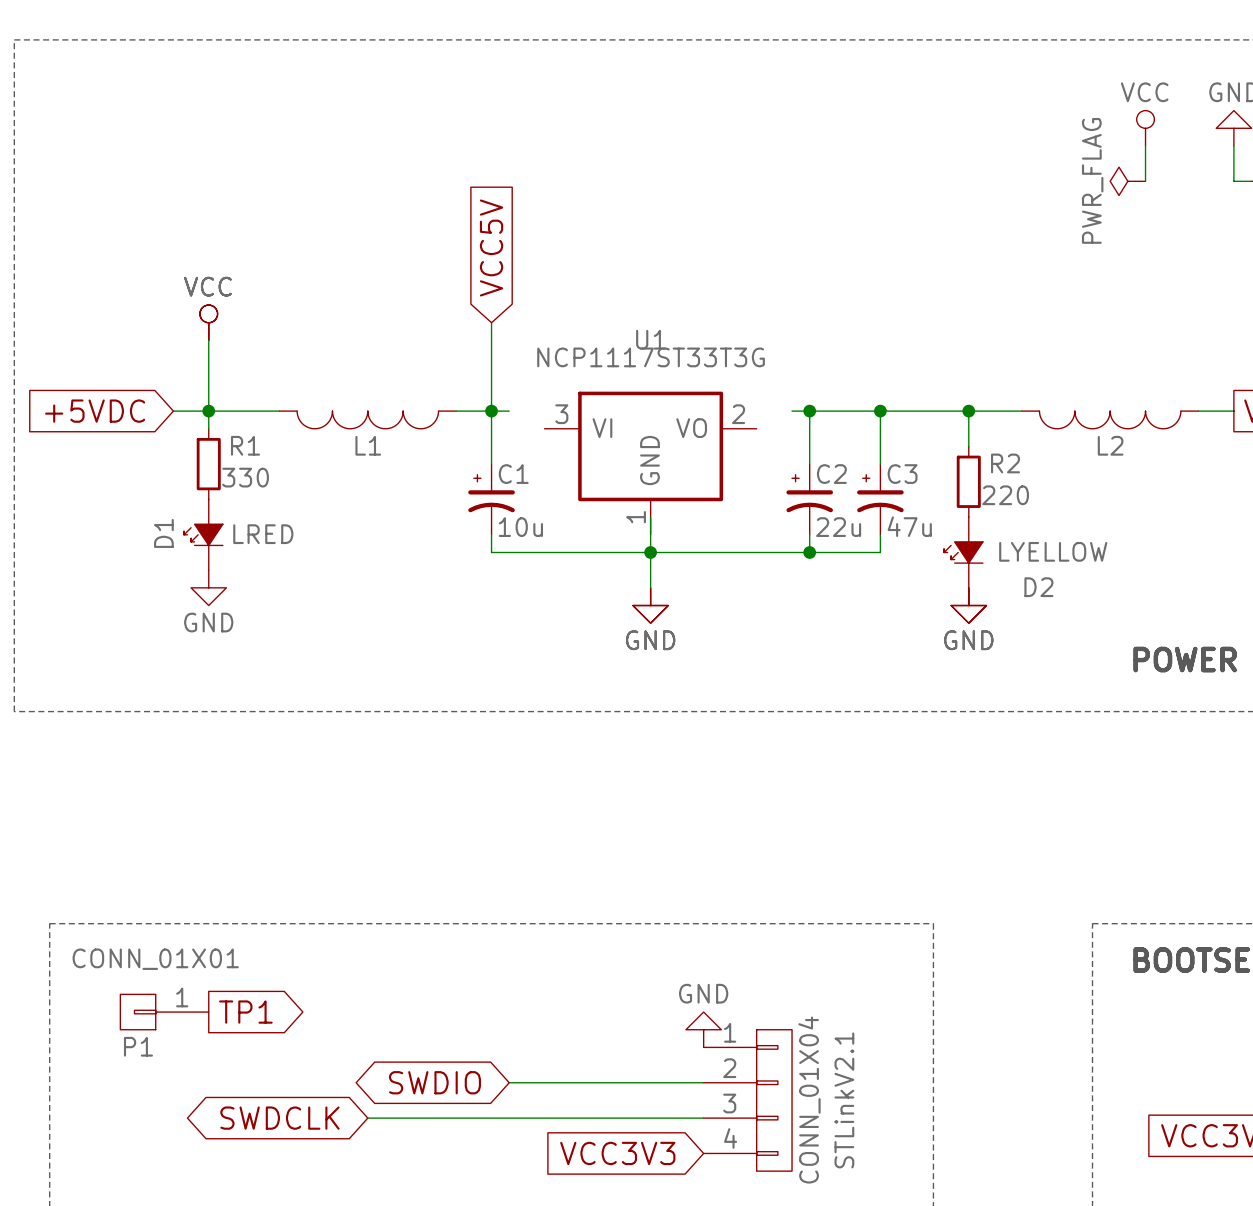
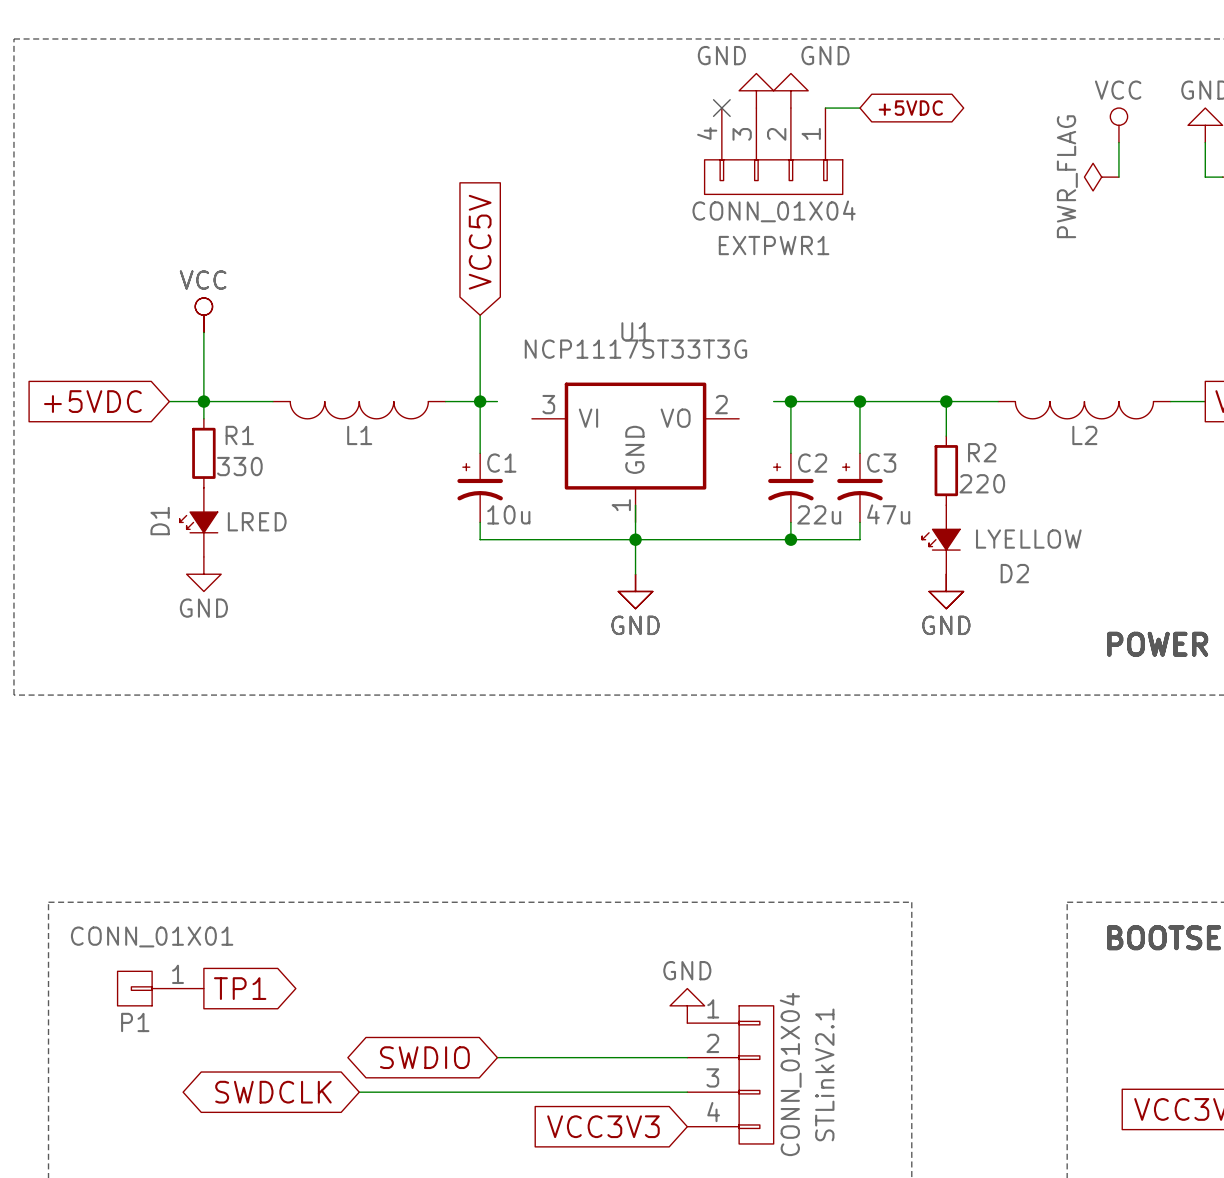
power symbol: none -> GND (756, 90)
power symbol: none -> GND (790, 90)
no-connect mark: none -> (721, 108)
wire: none -> (825, 108) (859, 108)
global label: none -> +5VDC (910, 108)
EXTPWR1: none -> CONN_01X04 (773, 151)

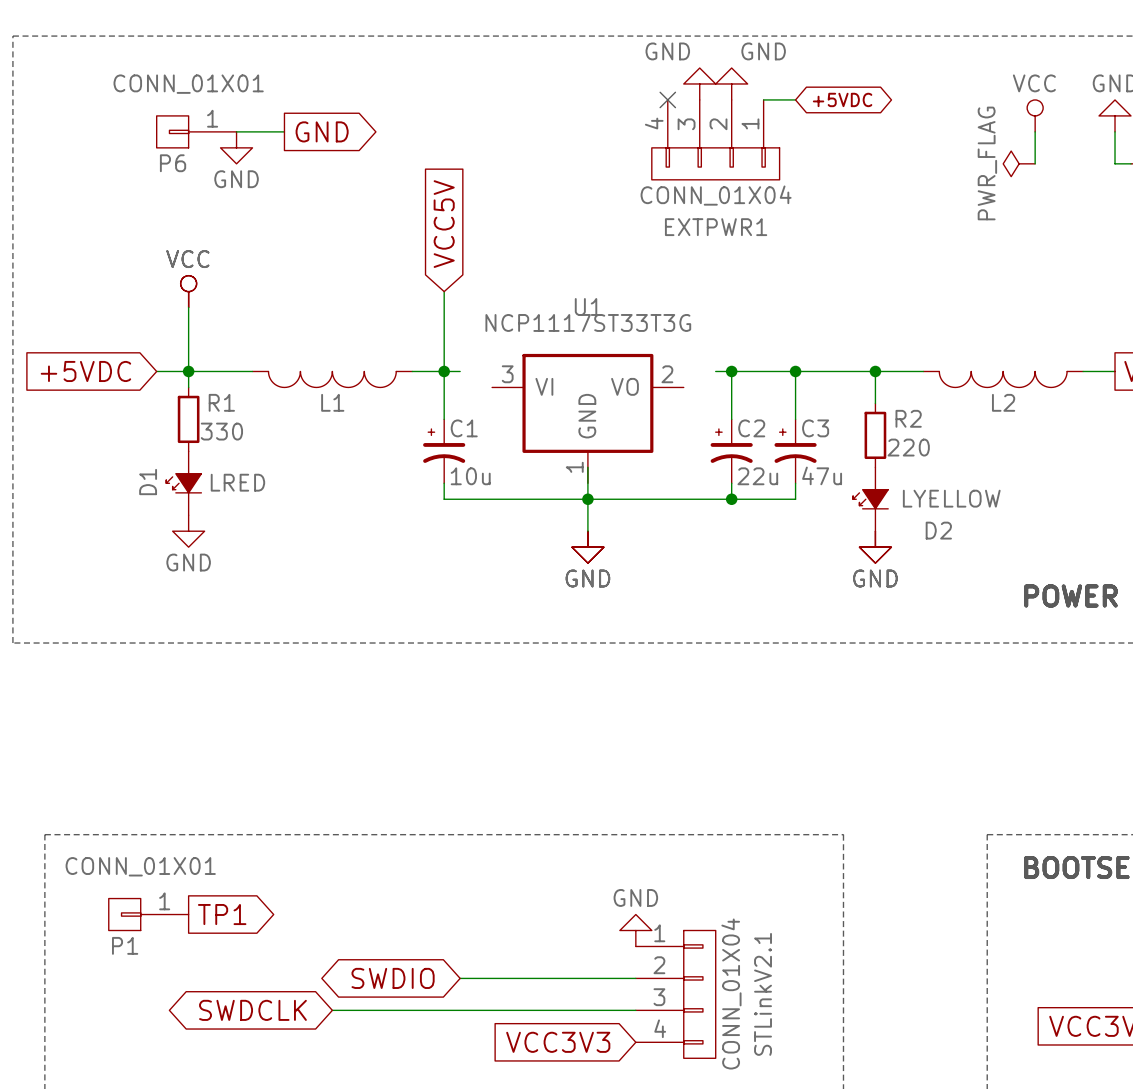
P6: none -> CONN_01X01 (196, 131)
wire: none -> (236, 131) (284, 131)
global label: none -> GND (322, 131)
power symbol: none -> GND (236, 147)

